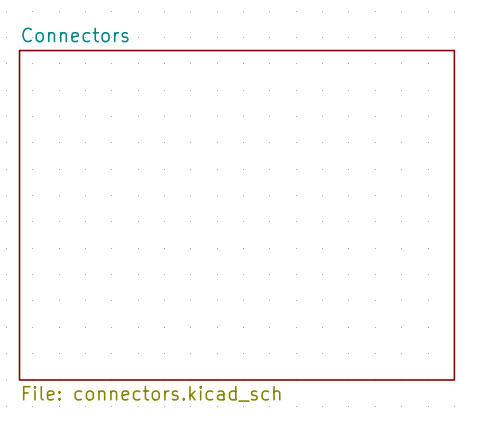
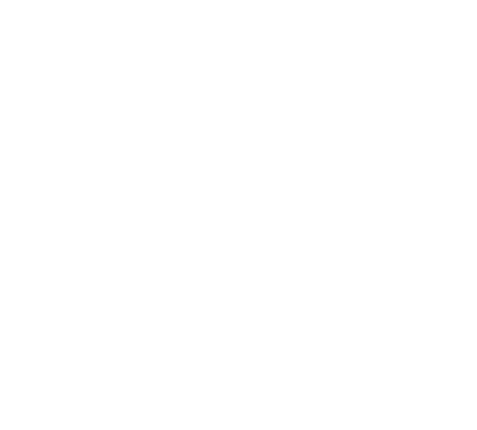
sheet Connectors: File: connectors.kicad_sch (236, 215) -> none

